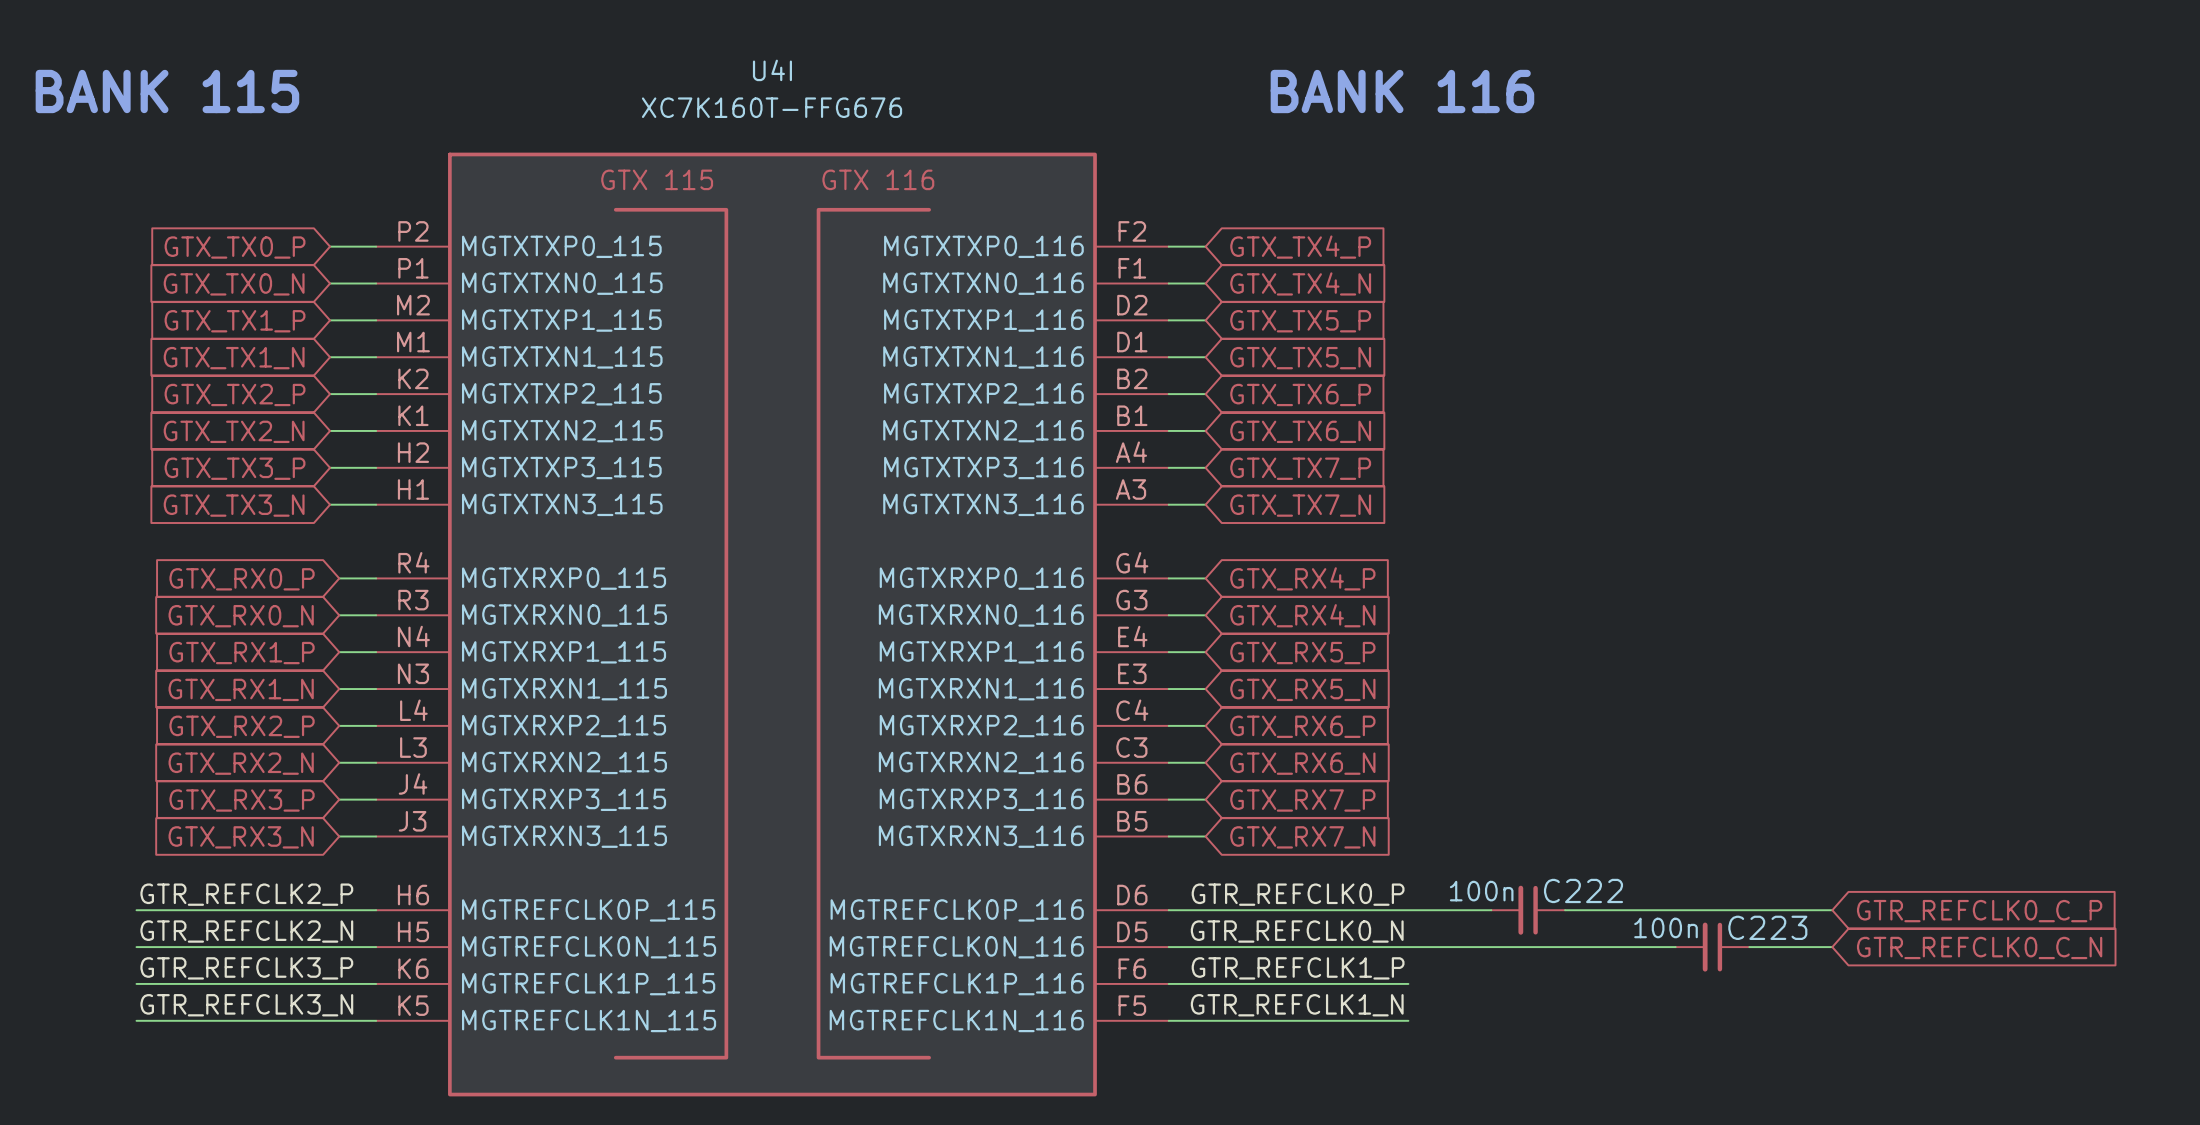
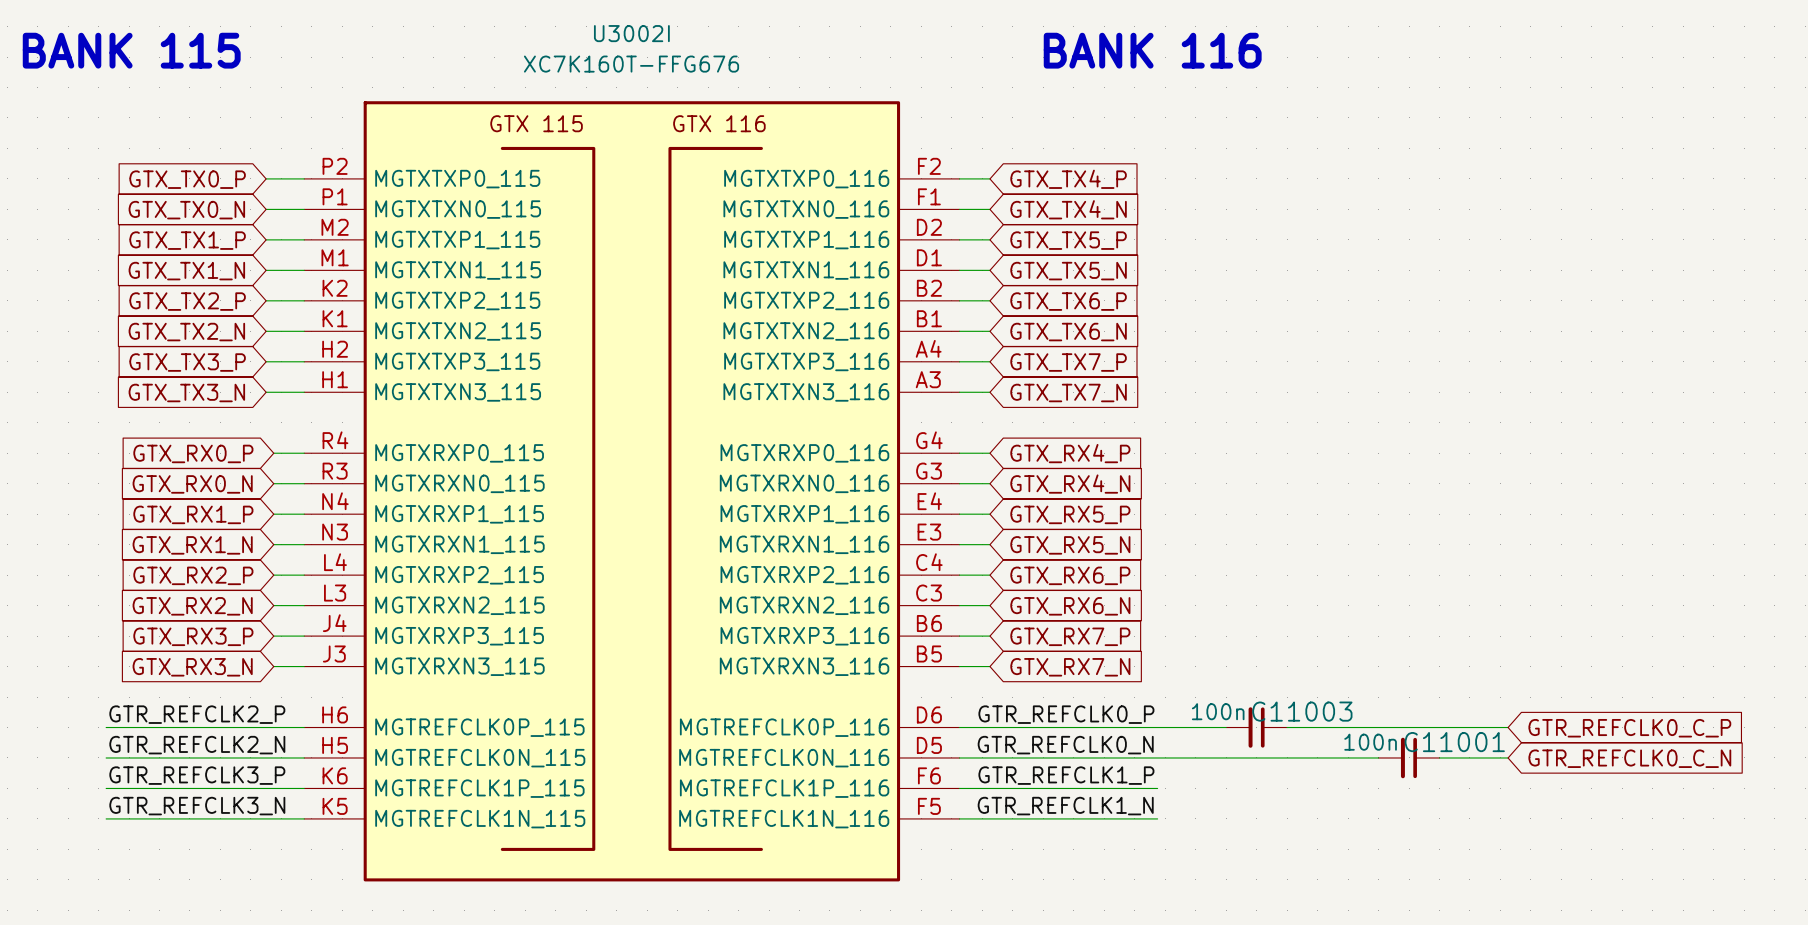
U4I name: U4I (772, 70) -> U3002I (631, 33)
C222 name: C222 (1583, 890) -> C11003 (1302, 711)
C223 name: C223 (1767, 927) -> C11001 (1454, 742)

